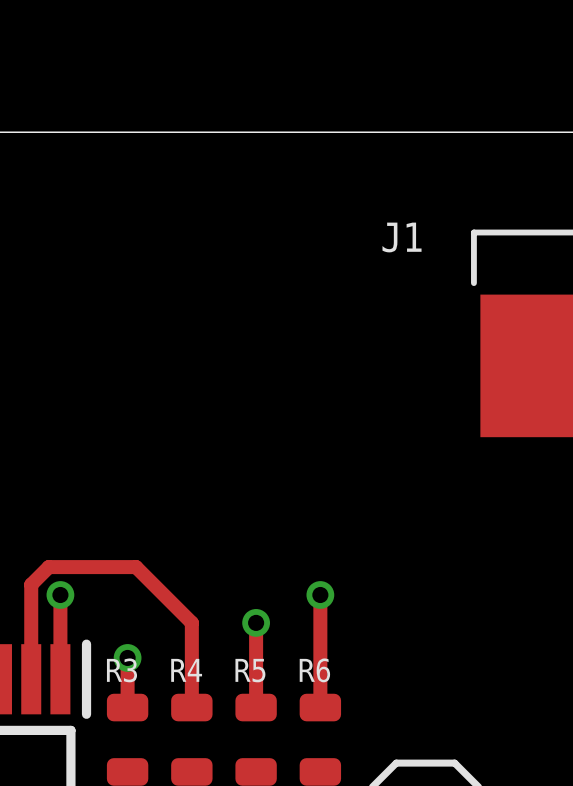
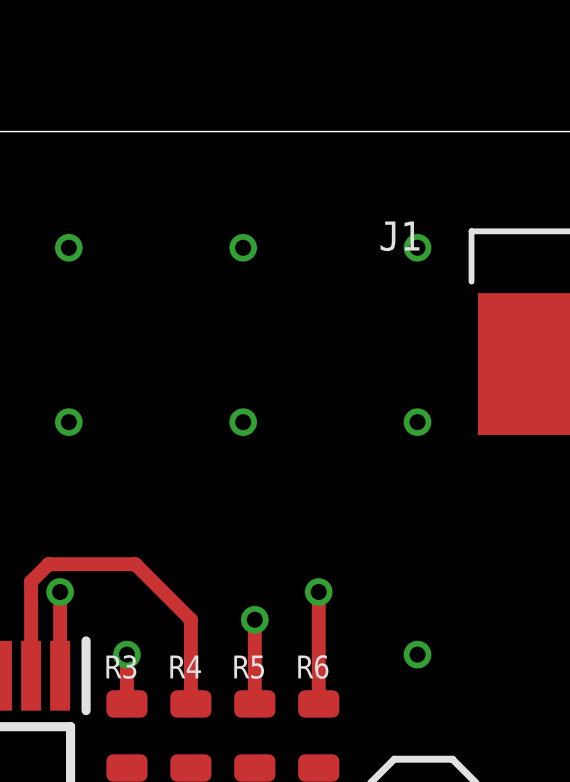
via: none -> (68, 247)
via: none -> (243, 247)
via: none -> (417, 247)
via: none -> (68, 422)
via: none -> (243, 422)
via: none -> (417, 422)
via: none -> (417, 654)

